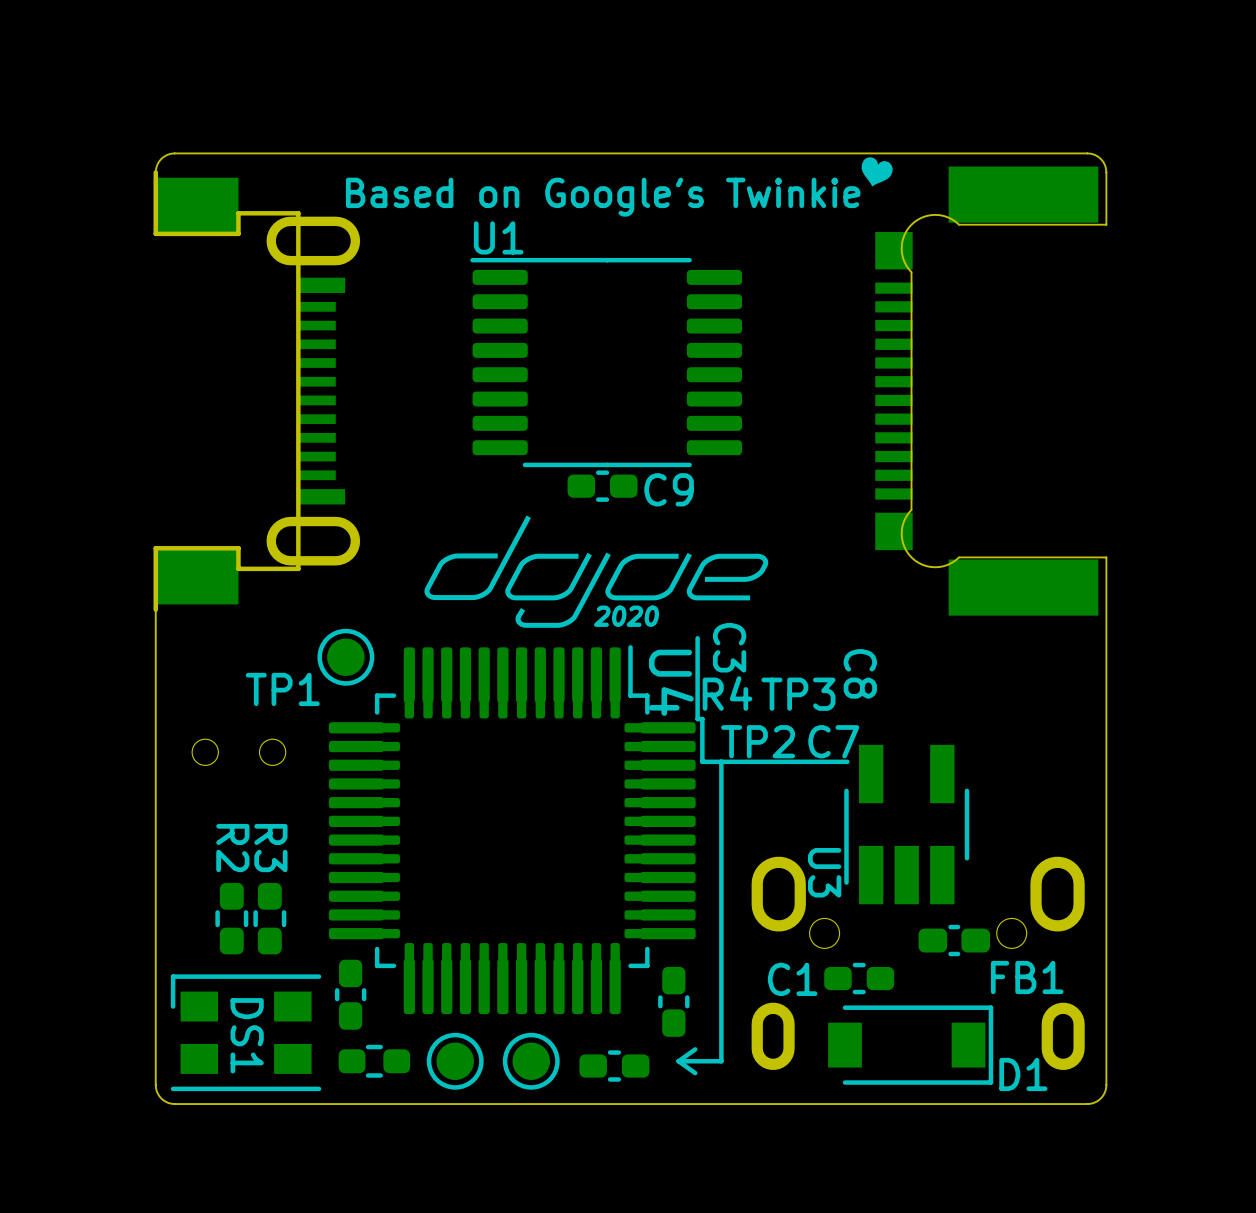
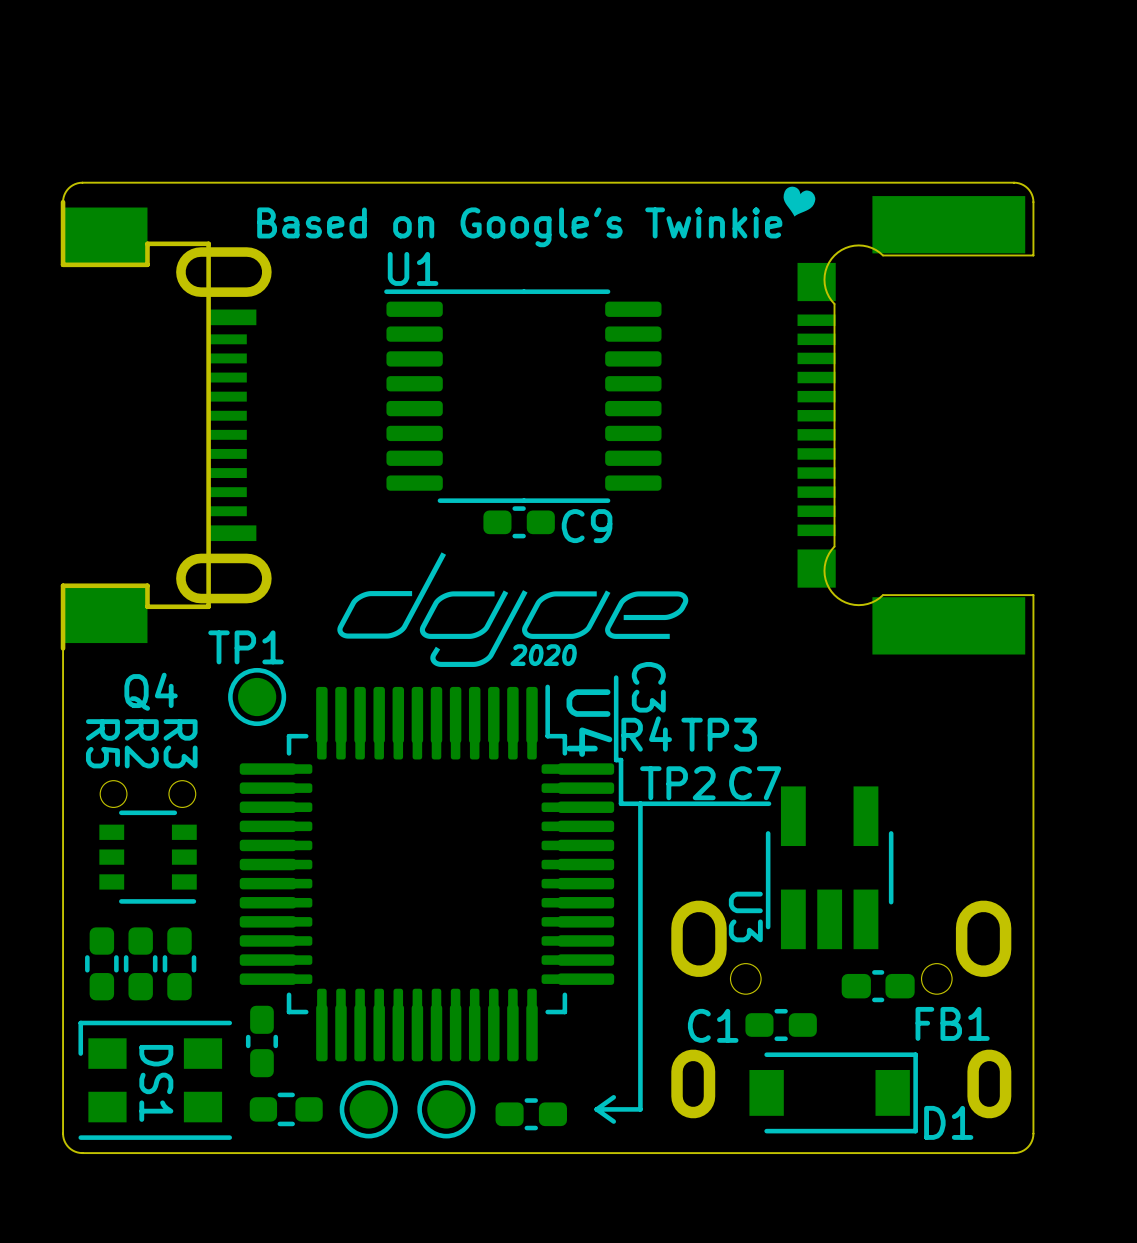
TP1 name position: TP1 (282, 689) -> TP1 (246, 647)
Q4: none -> (148, 857)
R2 name position: R2 (232, 848) -> R2 (141, 743)
R3 name position: R3 (270, 848) -> R3 (180, 743)
R5: none -> (101, 963)
C8: (673, 1001) -> none

